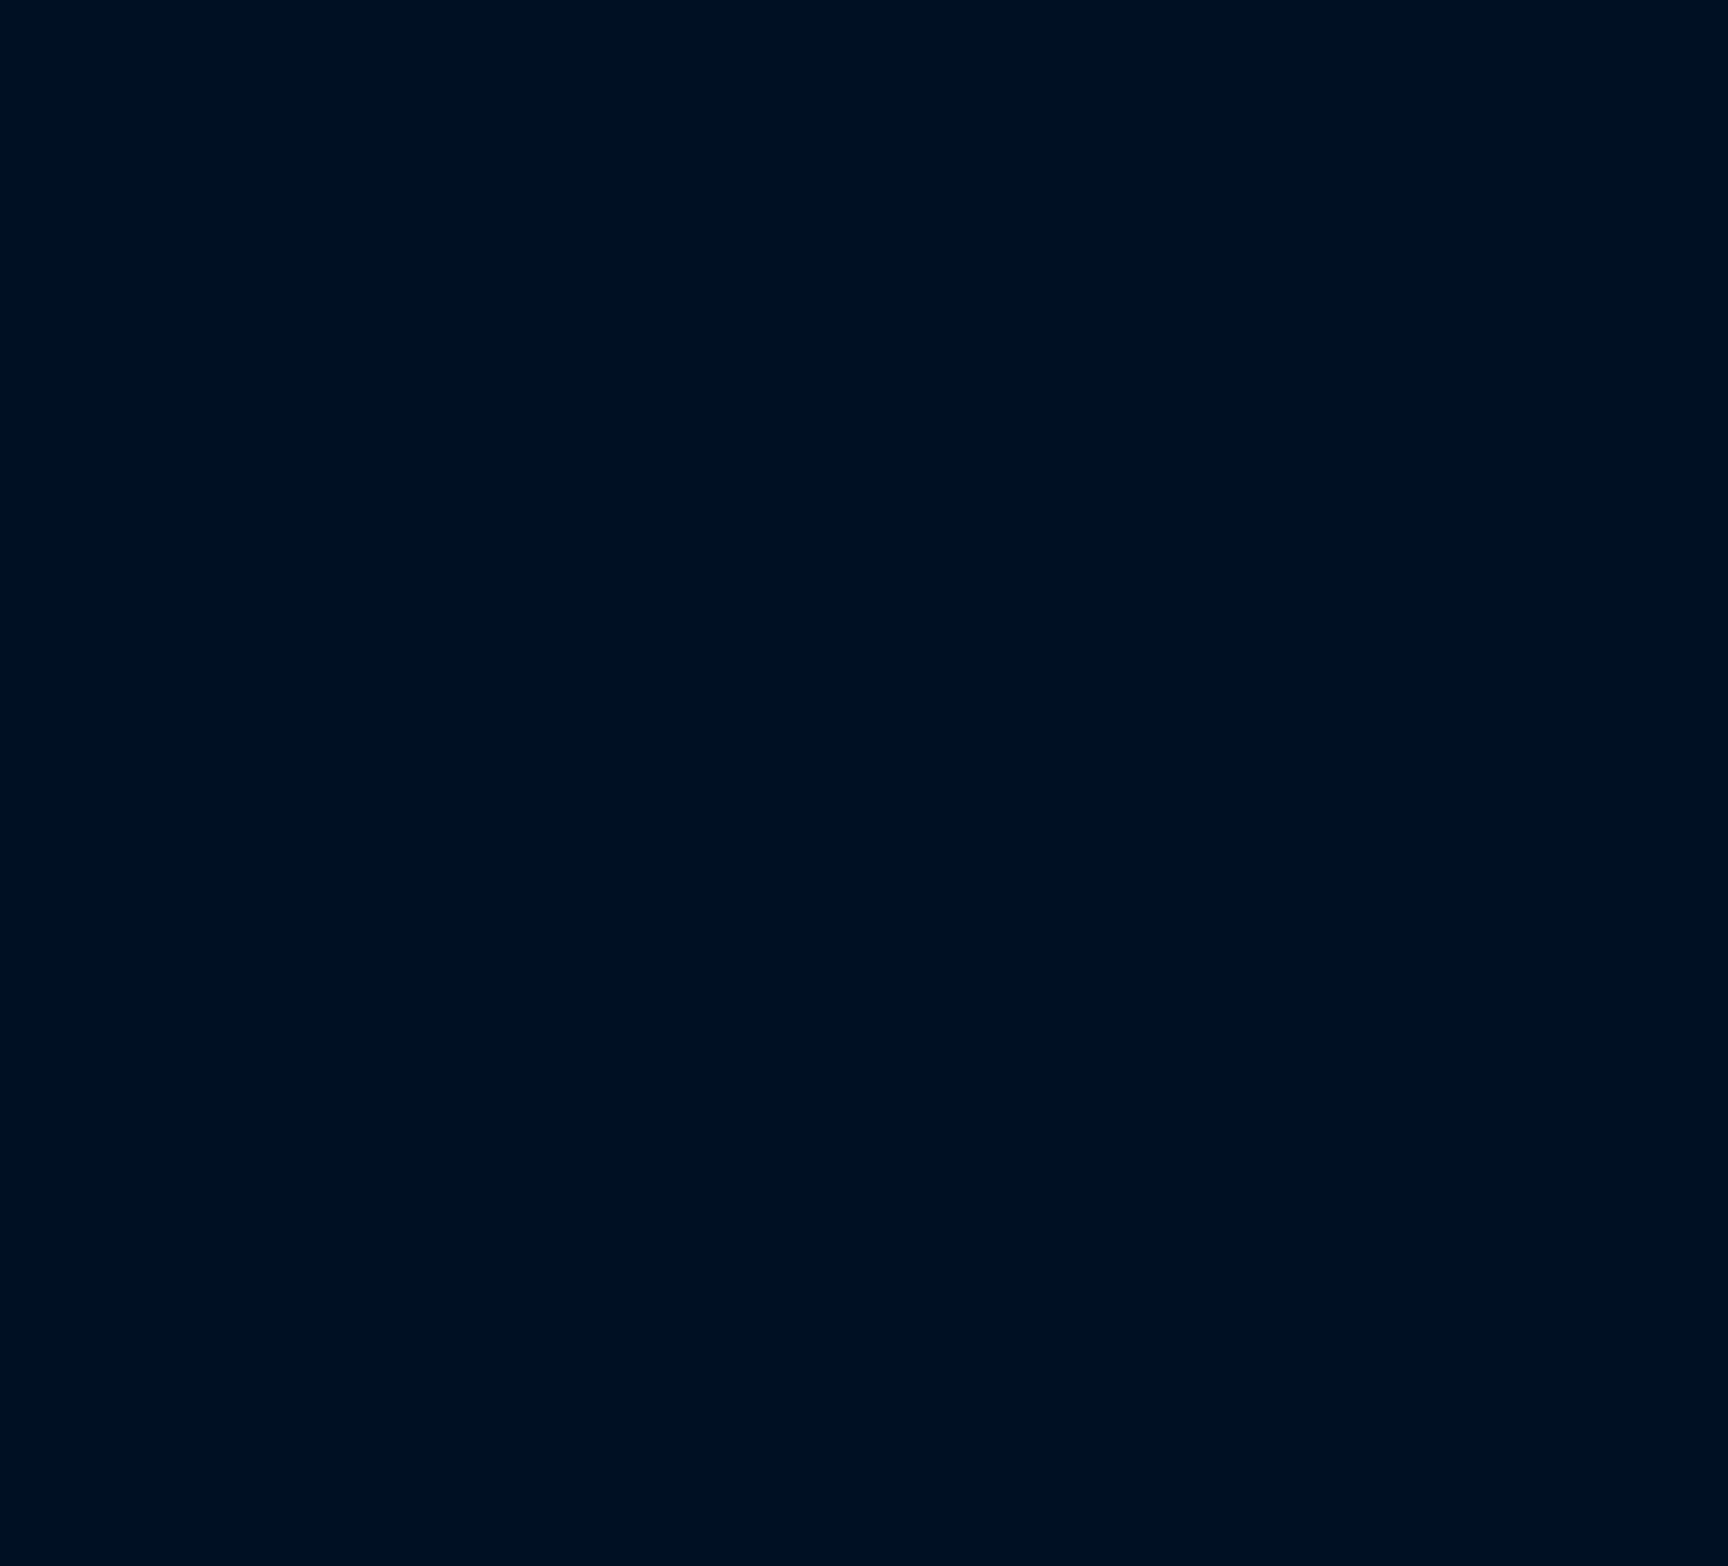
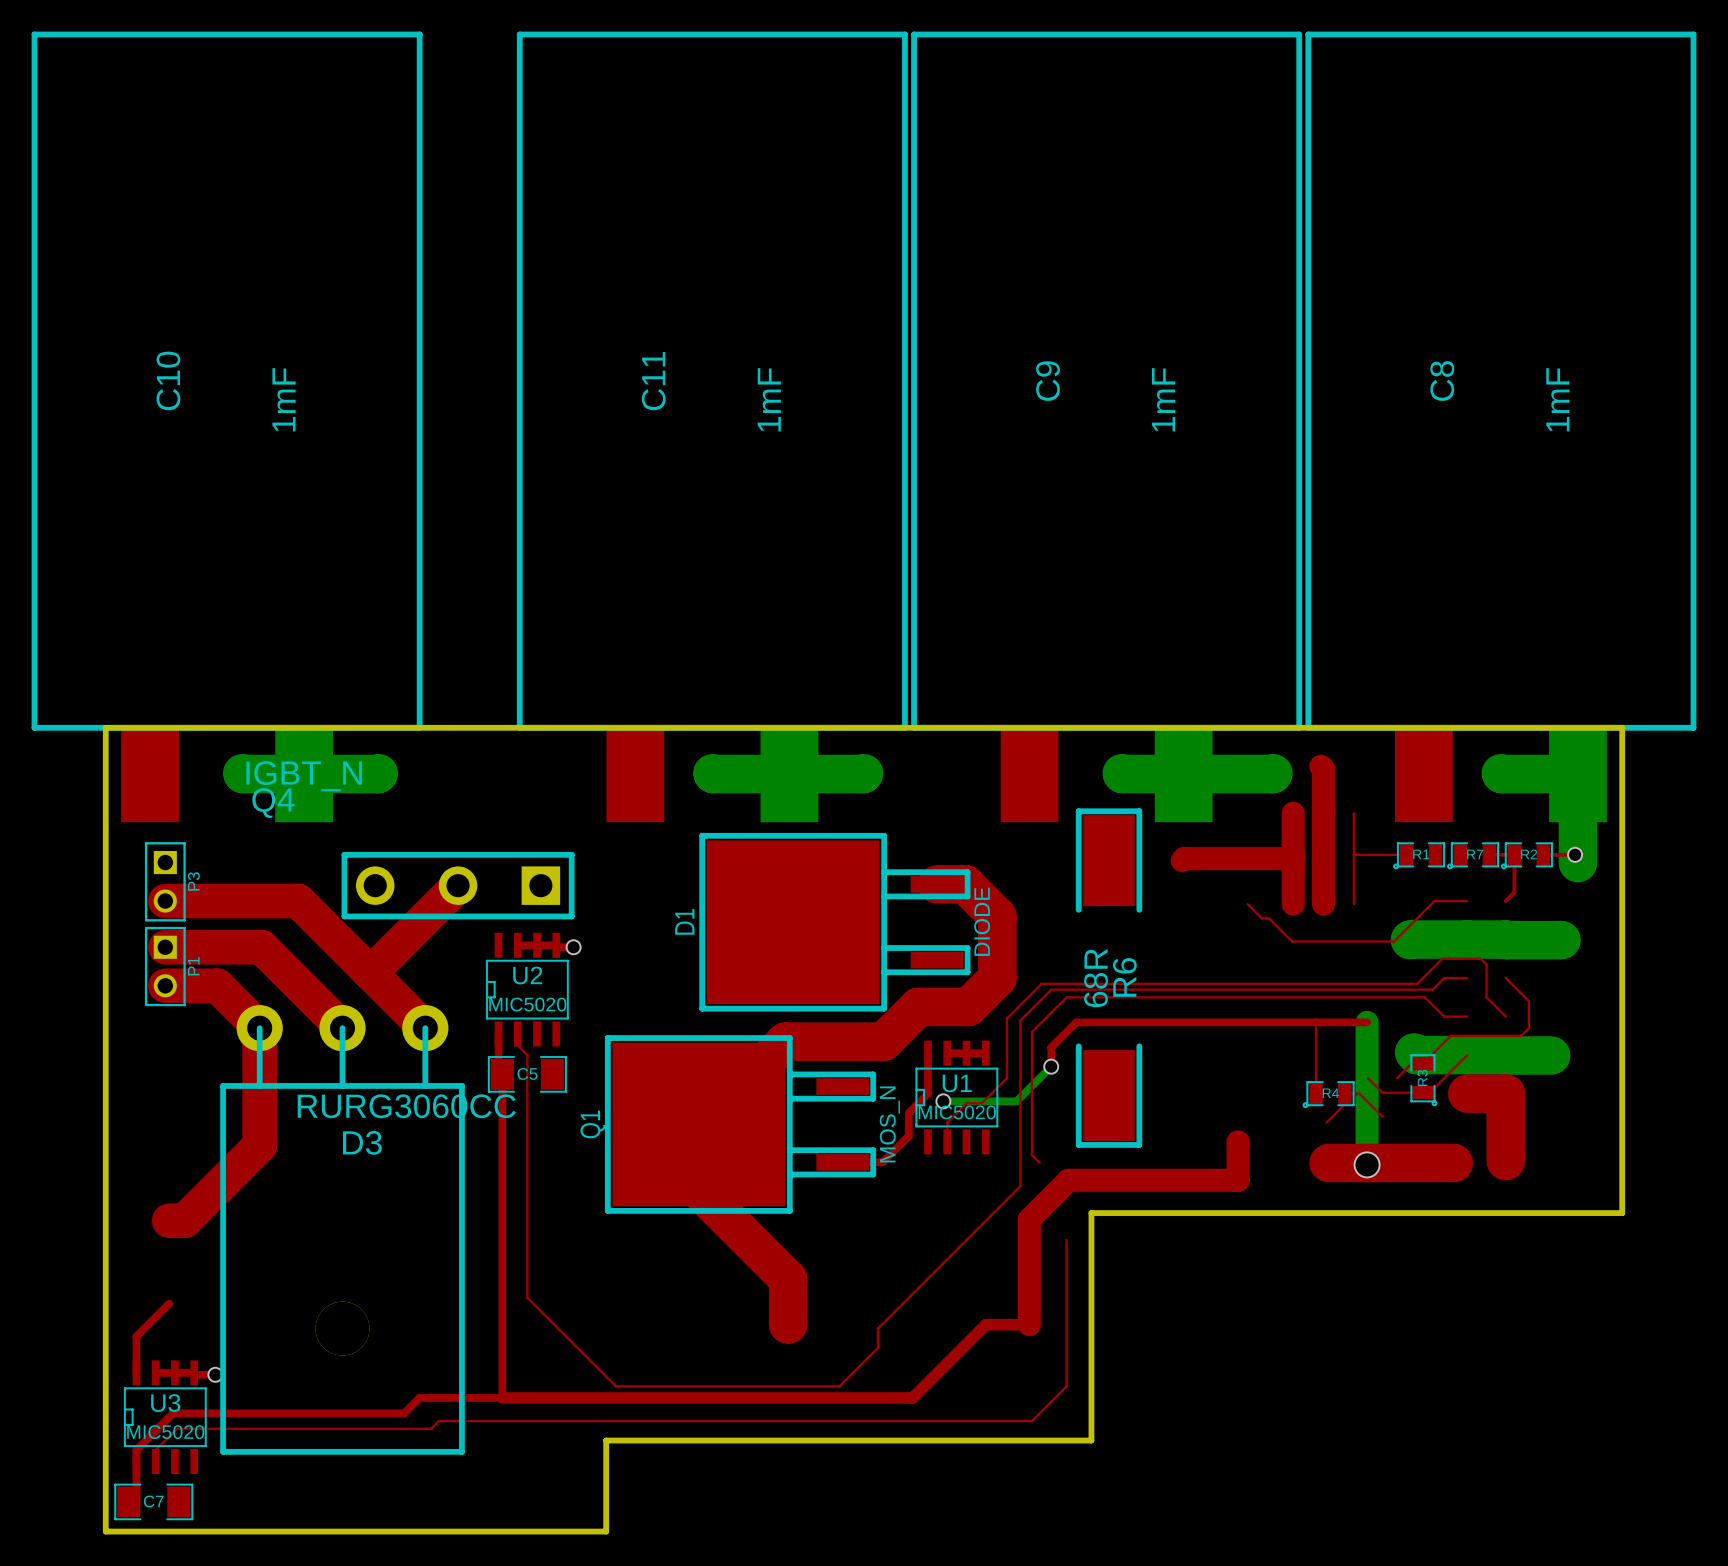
C10: none -> 1mF (227, 426)
C11: none -> 1mF (712, 426)
C9: none -> 1mF (1106, 426)
C8: none -> 1mF (1500, 426)
board edge: none -> (105, 727) (105, 1531) (606, 1531) (606, 1440) (1091, 1440) (1091, 1213) (1622, 1213) (1622, 727) (105, 727)
top track: none -> (1320, 766) (1323, 768) (1323, 904)
bottom track: none -> (242, 773) (378, 773)
bottom track: none -> (712, 773) (864, 773)
bottom track: none -> (1121, 773) (1273, 773)
bottom track: none -> (1500, 773) (1577, 774) (1577, 863) (1577, 857) (1575, 854)
top track: none -> (1293, 813) (1293, 904)
top track: none -> (1353, 813) (1353, 904)
top track: none -> (1353, 854) (1406, 854)
top track: none -> (1489, 854) (1514, 854) (1514, 892) (1505, 901)
top track: none -> (1543, 854) (1575, 854)
via: none -> (1575, 854)
R1: none -> (1419, 855)
R7: none -> (1473, 855)
R2: none -> (1526, 855)
top track: none -> (1293, 858) (1184, 858) (1182, 860)
P3: none -> (165, 881)
top track: none -> (937, 884) (965, 884) (997, 916) (997, 978) (968, 1006) (918, 1006) (883, 1041) (785, 1041) (702, 1124) (698, 1124) (698, 1189) (788, 1279) (788, 1324)
top track: none -> (458, 885) (372, 971) (368, 971)
Q4: none -> IGBT_N (458, 885)
top track: none -> (165, 901) (298, 901) (425, 1028)
top track: none -> (1467, 901) (1434, 901) (1394, 941) (1291, 941) (1268, 918) (1261, 918) (1247, 904)
D1: none -> DIODE (834, 922)
bottom track: none -> (1409, 940) (1561, 940)
top track: none -> (517, 945) (573, 947)
top track: none -> (165, 947) (261, 947) (342, 1028)
via: none -> (573, 947)
P1: none -> (165, 966)
R6: none -> 68R (1109, 978)
top track: none -> (1467, 978) (1444, 978) (1432, 989) (1051, 989) (1020, 1020) (1020, 1186) (877, 1328) (877, 1347) (839, 1386) (615, 1386) (527, 1297) (527, 1055) (517, 1045) (517, 1033)
top track: none -> (1505, 978) (1528, 1001) (1528, 1028) (1521, 1035) (1450, 1035) (1422, 1063) (1411, 1063) (1396, 1078)
top track: none -> (165, 985) (217, 985) (259, 1028) (259, 1145) (184, 1220) (169, 1220)
U2: none -> MIC5020 (527, 989)
top track: none -> (1467, 1016) (1444, 1016) (1424, 997) (1066, 997) (1031, 1032) (1031, 1155) (1039, 1162)
top track: none -> (1505, 1016) (1486, 997) (1486, 964) (1480, 958) (1442, 958) (1417, 983) (1041, 983) (1006, 1018) (1006, 1078) (981, 1103) (966, 1103) (947, 1122) (947, 1141)
top track: none -> (1316, 1022) (1316, 1093)
top track: none -> (1367, 1022) (1076, 1022) (1051, 1047) (1051, 1066)
bottom track: none -> (1367, 1022) (1367, 1164)
top track: none -> (498, 1033) (498, 1070) (502, 1074) (502, 1397)
bottom track: none -> (1414, 1052) (1416, 1055) (1551, 1055)
top track: none -> (927, 1053) (927, 1093) (908, 1112) (908, 1136) (882, 1162) (842, 1162)
top track: none -> (947, 1053) (985, 1053)
top track: none -> (1467, 1055) (1429, 1092) (1382, 1092) (1368, 1078)
bottom track: none -> (1051, 1066) (1016, 1101) (943, 1101)
via: none -> (1051, 1066)
C5: none -> (527, 1074)
R3: none -> (1423, 1080)
top track: none -> (1467, 1093) (1505, 1093) (1505, 1161)
R4: none -> (1328, 1094)
U1: none -> MIC5020 (956, 1097)
via: none -> (943, 1101)
top track: none -> (1382, 1116) (1359, 1093) (1344, 1093) (1344, 1104) (1326, 1122)
Q1: none -> MOS_N (740, 1124)
top track: none -> (1238, 1141) (1238, 1180) (1068, 1180) (1029, 1219) (1029, 1324) (985, 1324) (912, 1397) (502, 1397)
top track: none -> (1328, 1162) (1453, 1162) (1328, 1162)
via: none -> (1367, 1164)
D3: none -> RURG3060CC (342, 1229)
top track: none -> (1066, 1240) (1066, 1386) (1031, 1421) (438, 1421) (431, 1428) (176, 1428) (155, 1449) (155, 1461)
top track: none -> (169, 1303) (136, 1336) (136, 1372)
top track: none -> (155, 1372) (215, 1374)
via: none -> (215, 1374)
top track: none -> (502, 1397) (419, 1397) (404, 1413) (173, 1413) (136, 1449) (136, 1494) (128, 1501)
U3: none -> MIC5020 (165, 1417)
C7: none -> (153, 1501)

